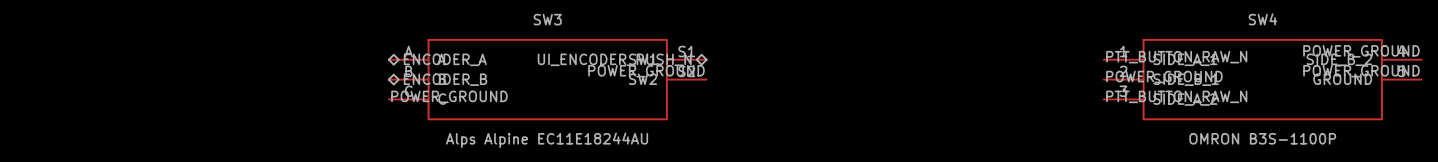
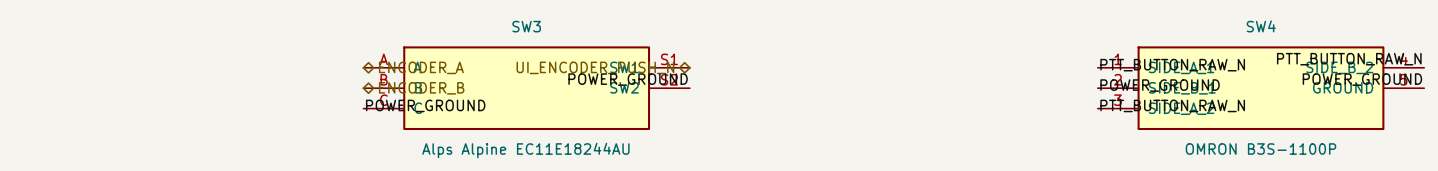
label: POWER_GROUND (1361, 51) -> PTT_BUTTON_RAW_N (1349, 59)

